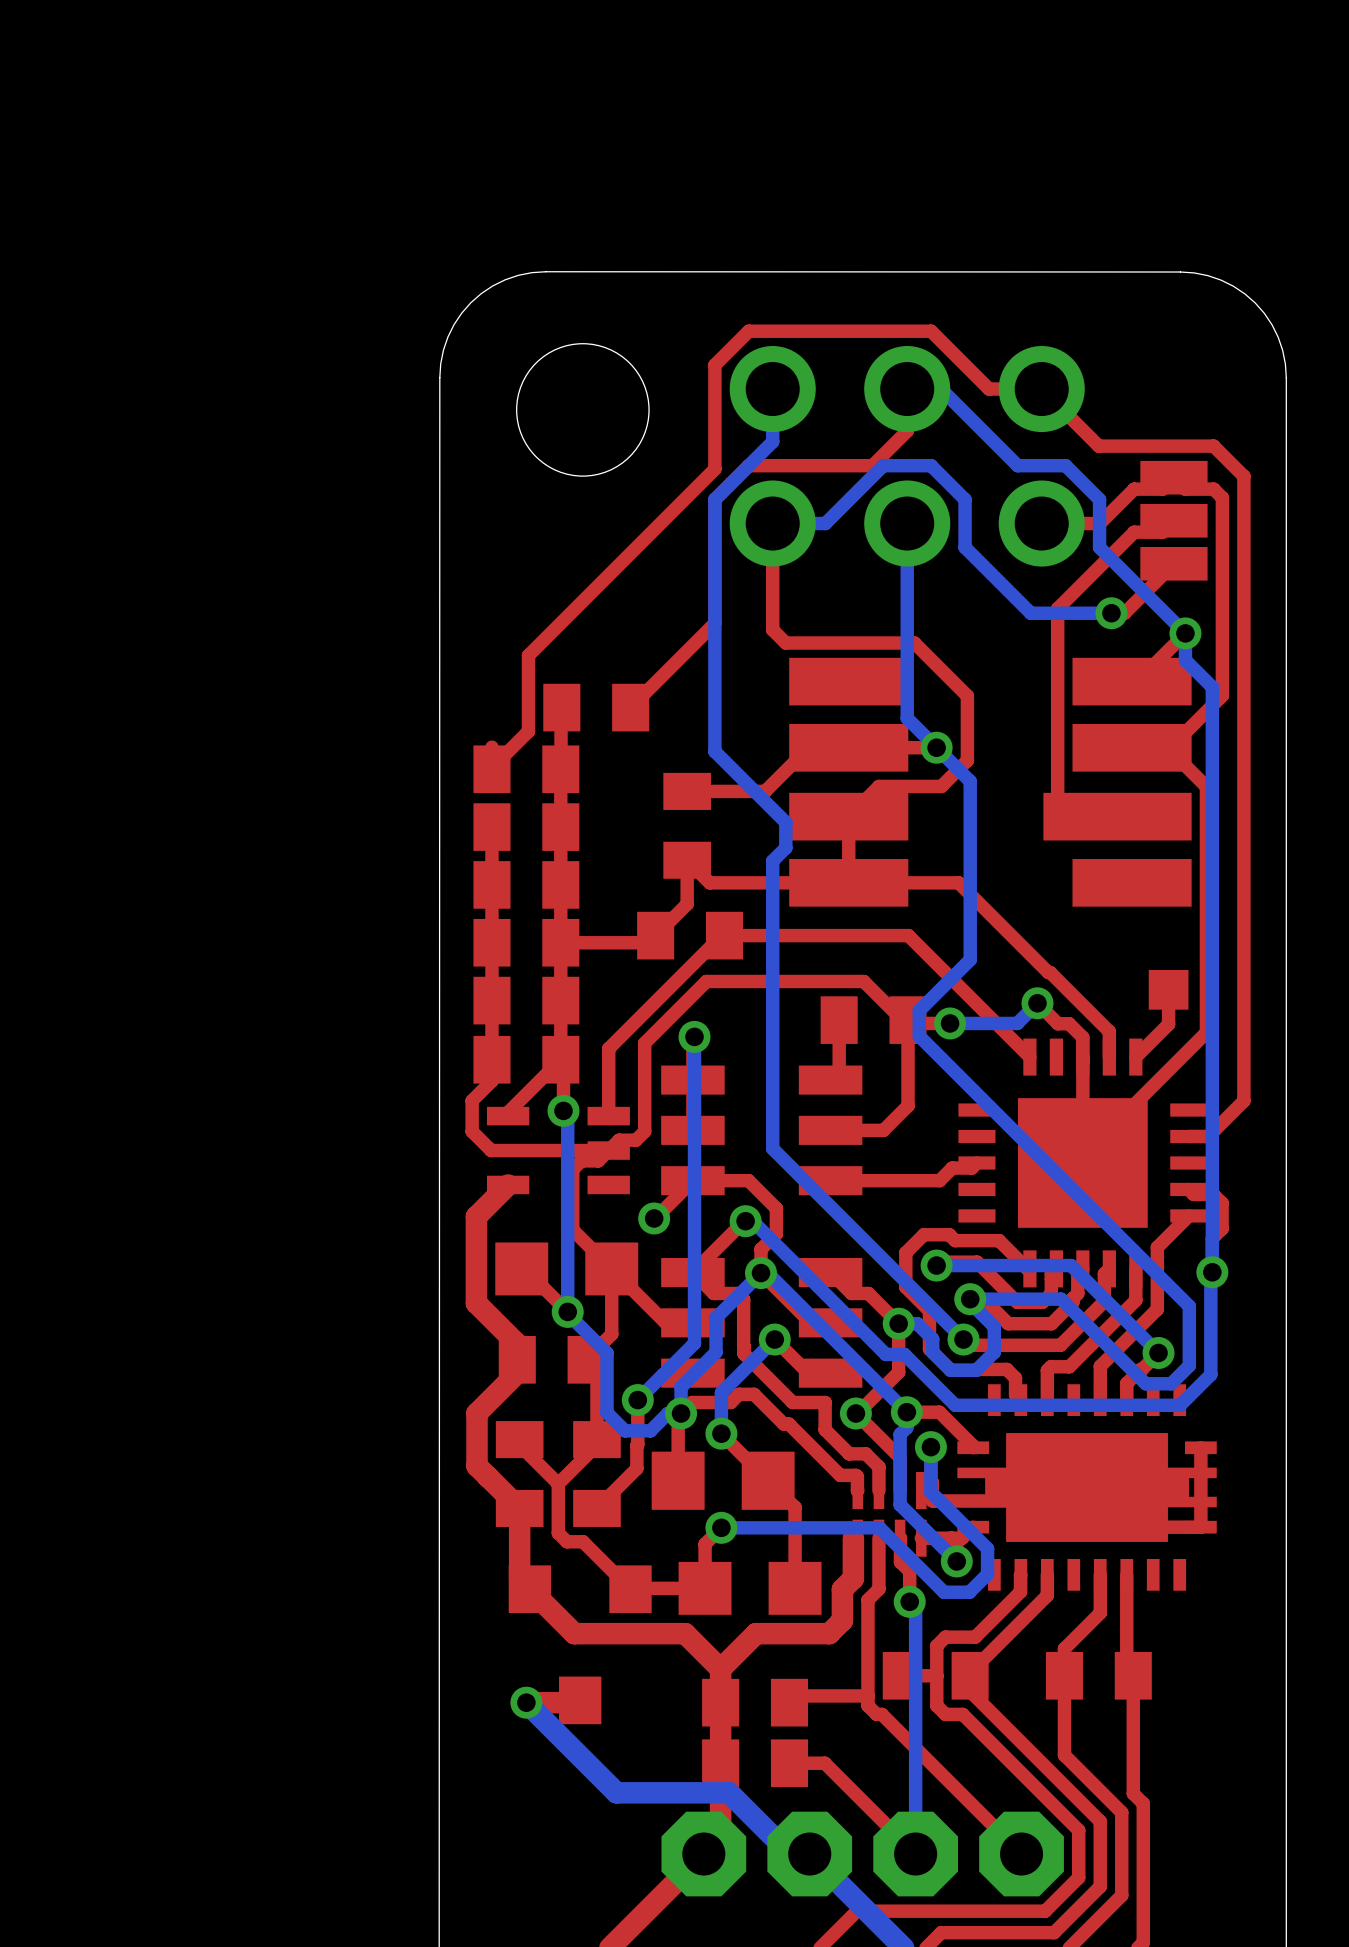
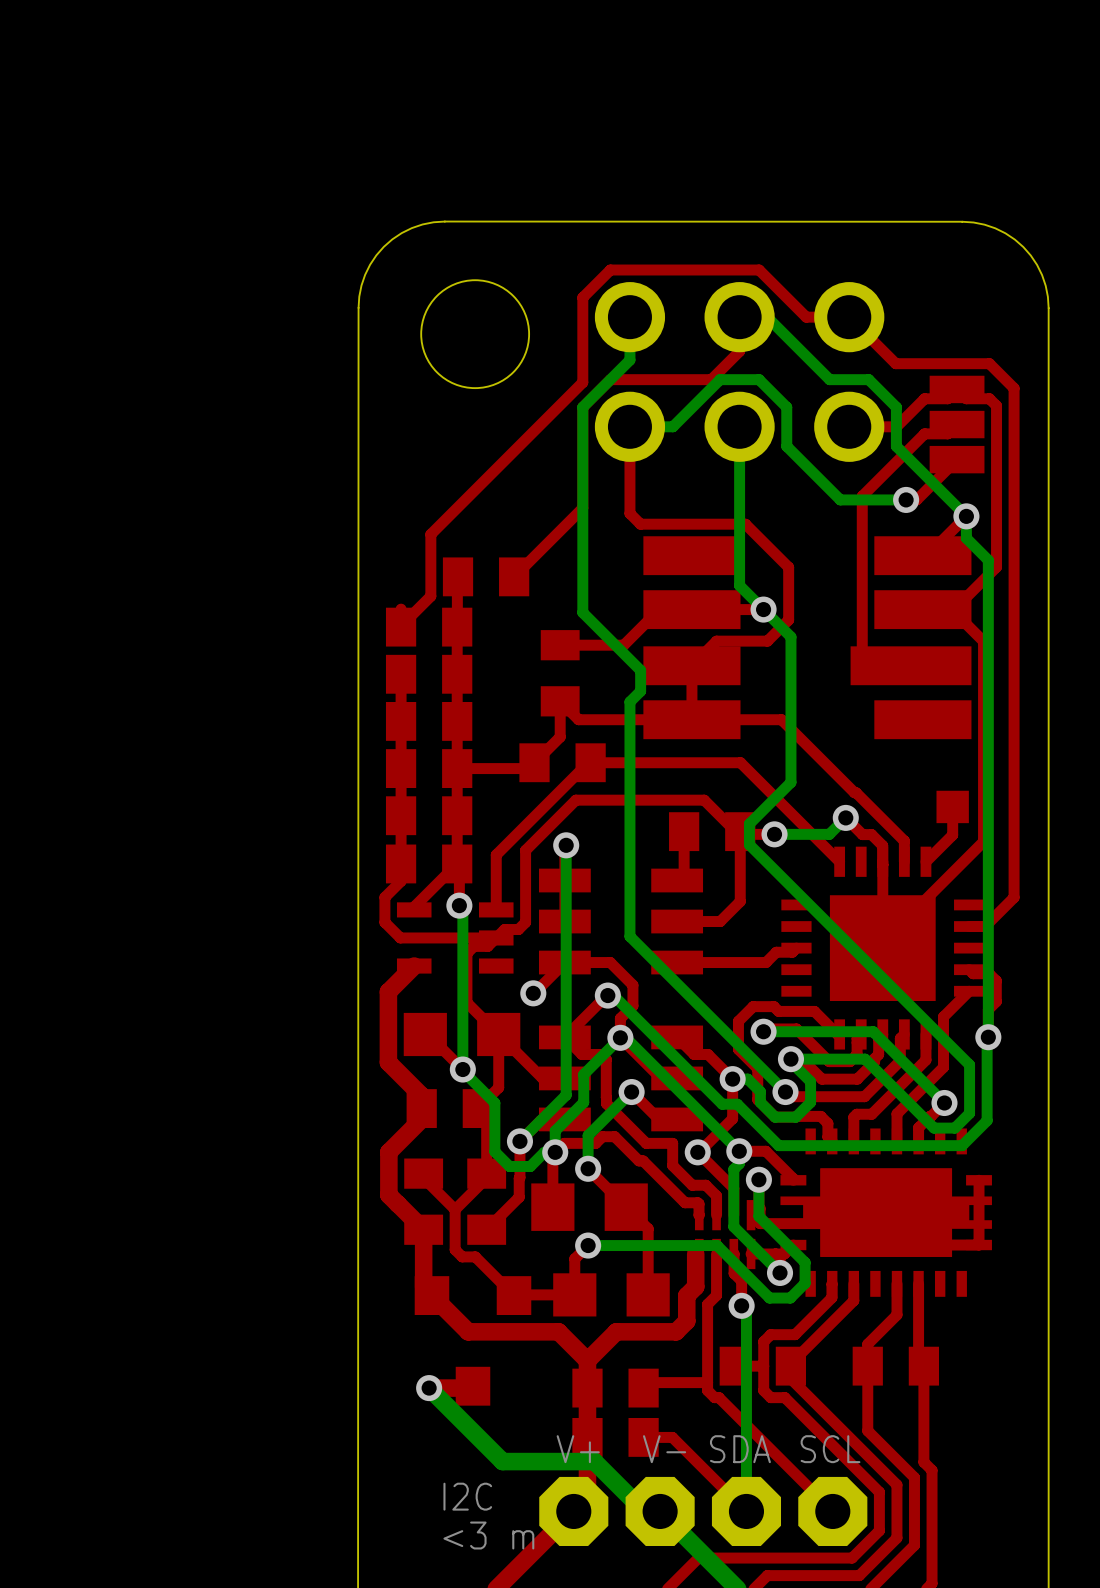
text: none -> V+ (578, 1449)
text: none -> V- (664, 1449)
text: none -> SDA (740, 1449)
text: none -> SCL (830, 1449)
text: none -> I2C (467, 1496)
text: none -> <3 m (488, 1535)

